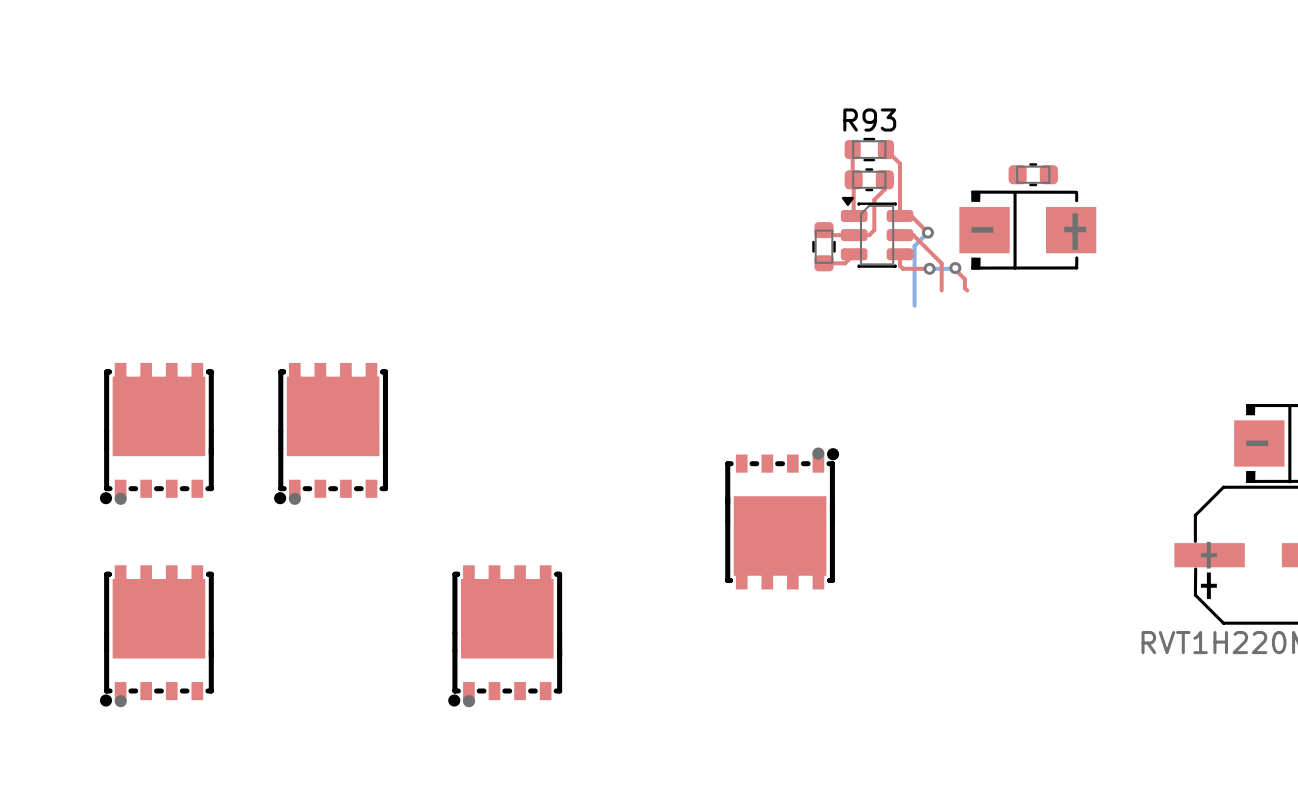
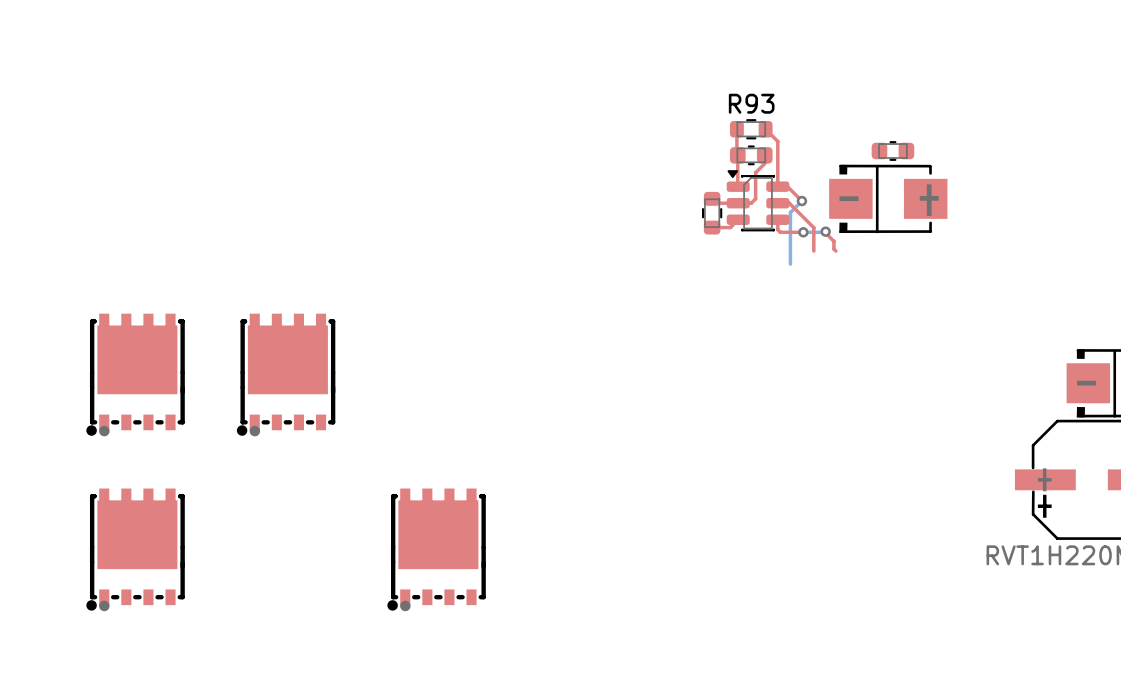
part: (782, 518) -> none

